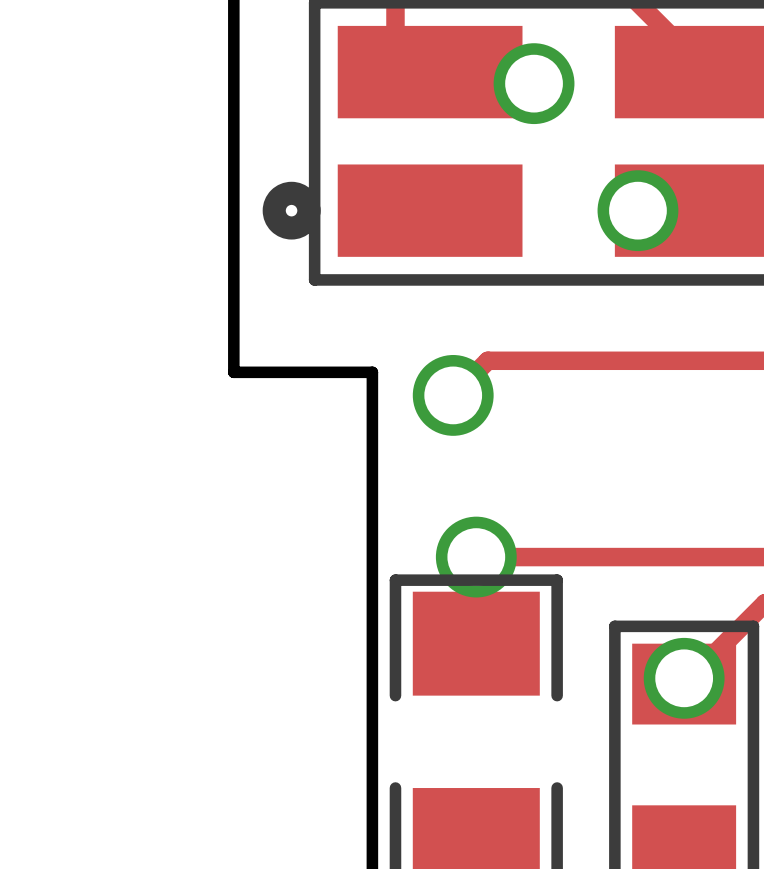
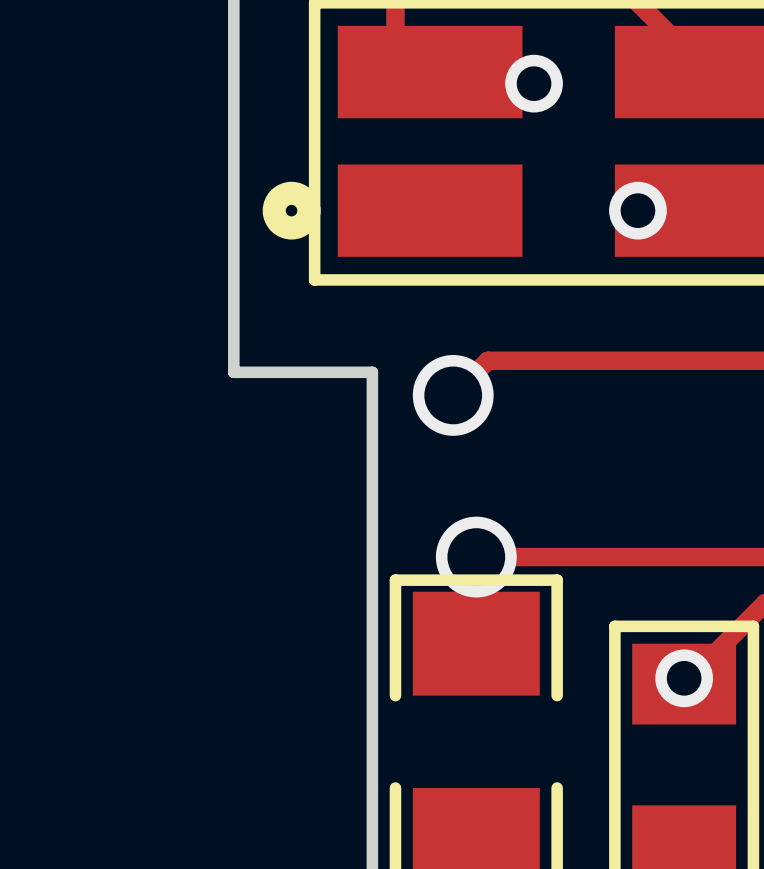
via size: [493, 43, 575, 125] -> [505, 54, 563, 113]
via size: [597, 170, 679, 252] -> [609, 181, 667, 240]
via size: [643, 637, 725, 719] -> [655, 649, 714, 708]

